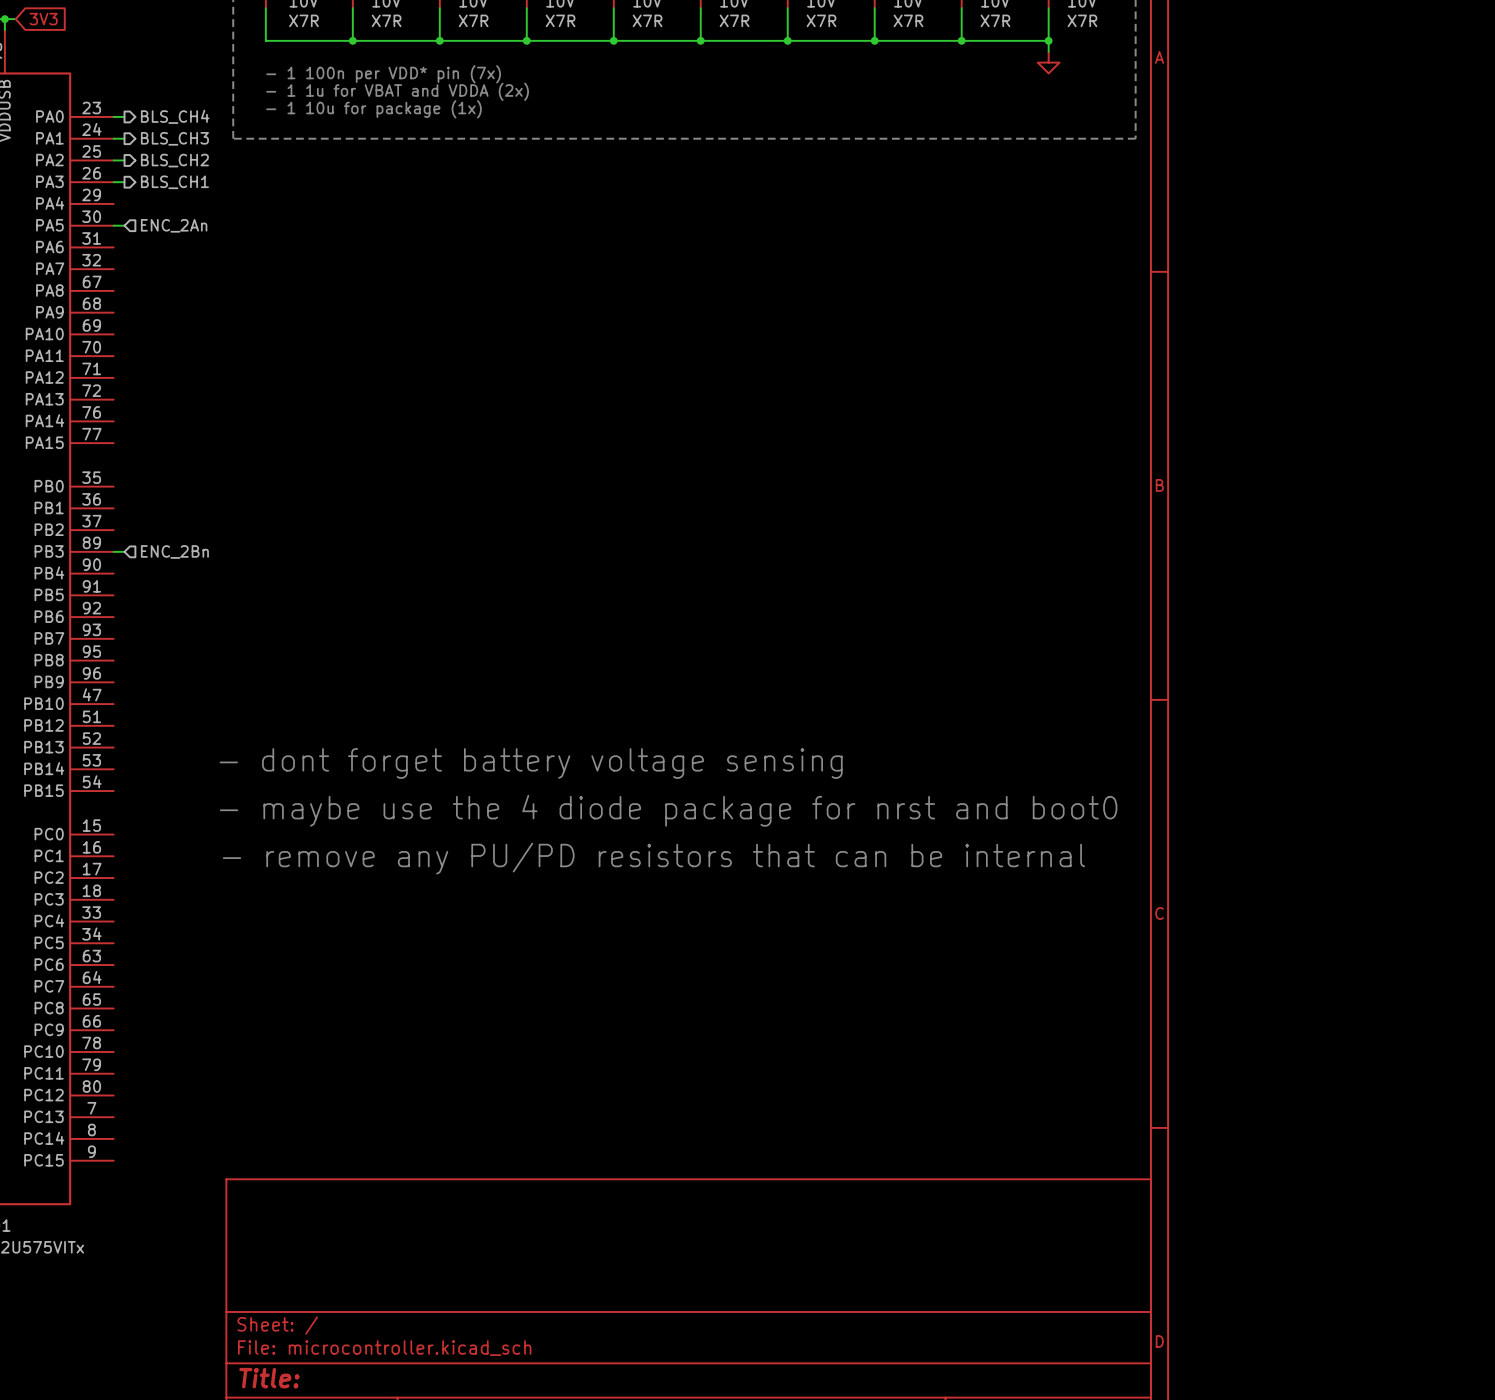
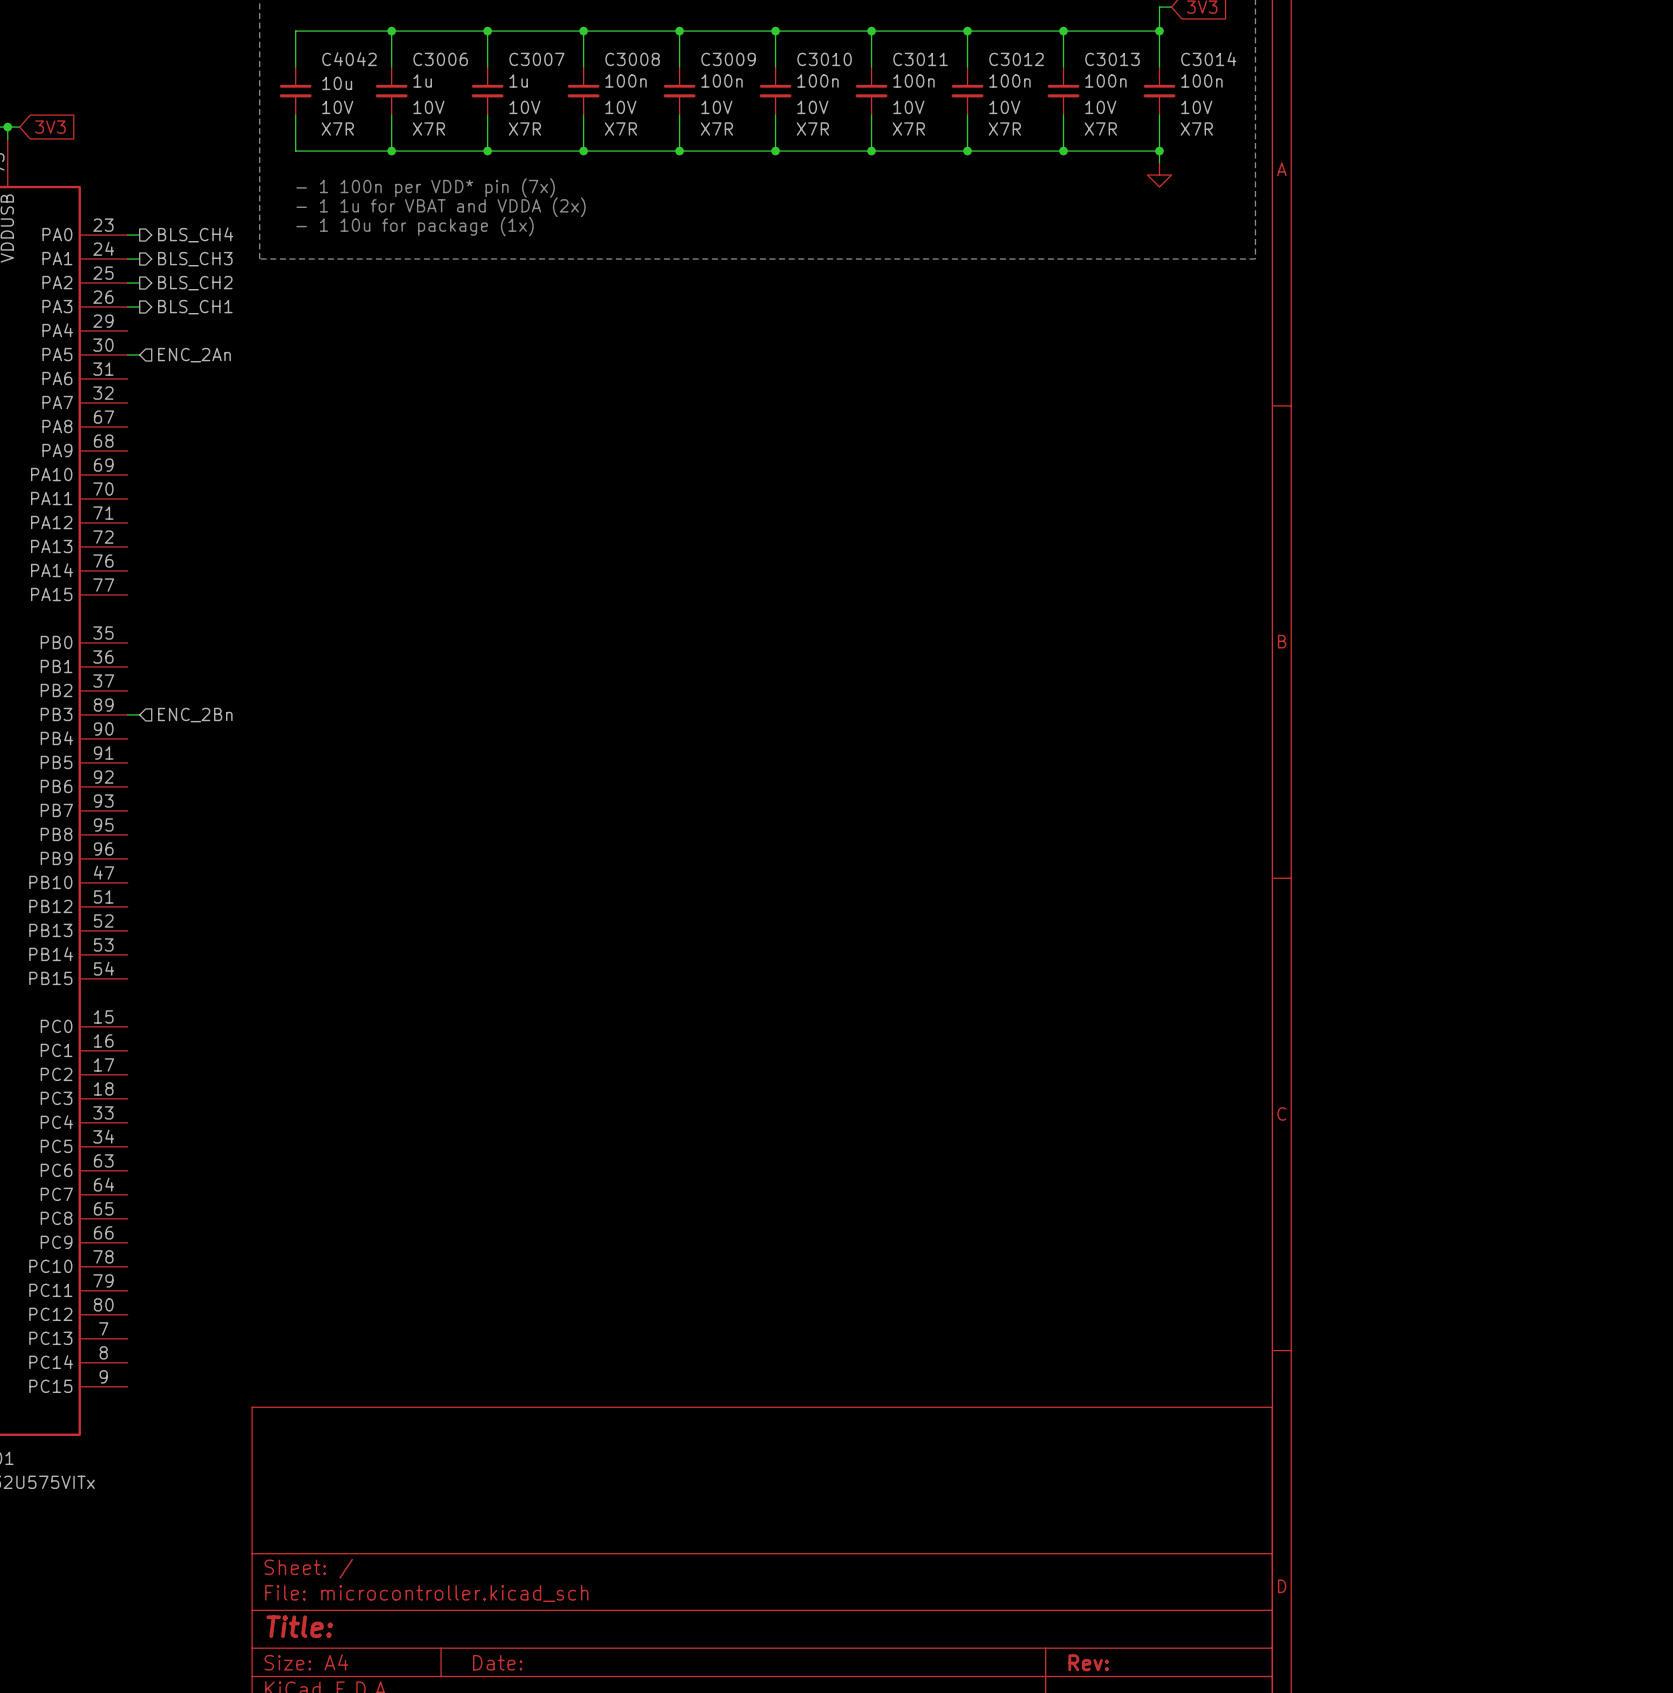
text: - dont forget battery voltage sensing (531, 763) -> none
text: - maybe use the 4 diode package for nrst and boot0 (668, 810) -> none
text: - remove any PU/PD resistors that can be internal (653, 858) -> none

